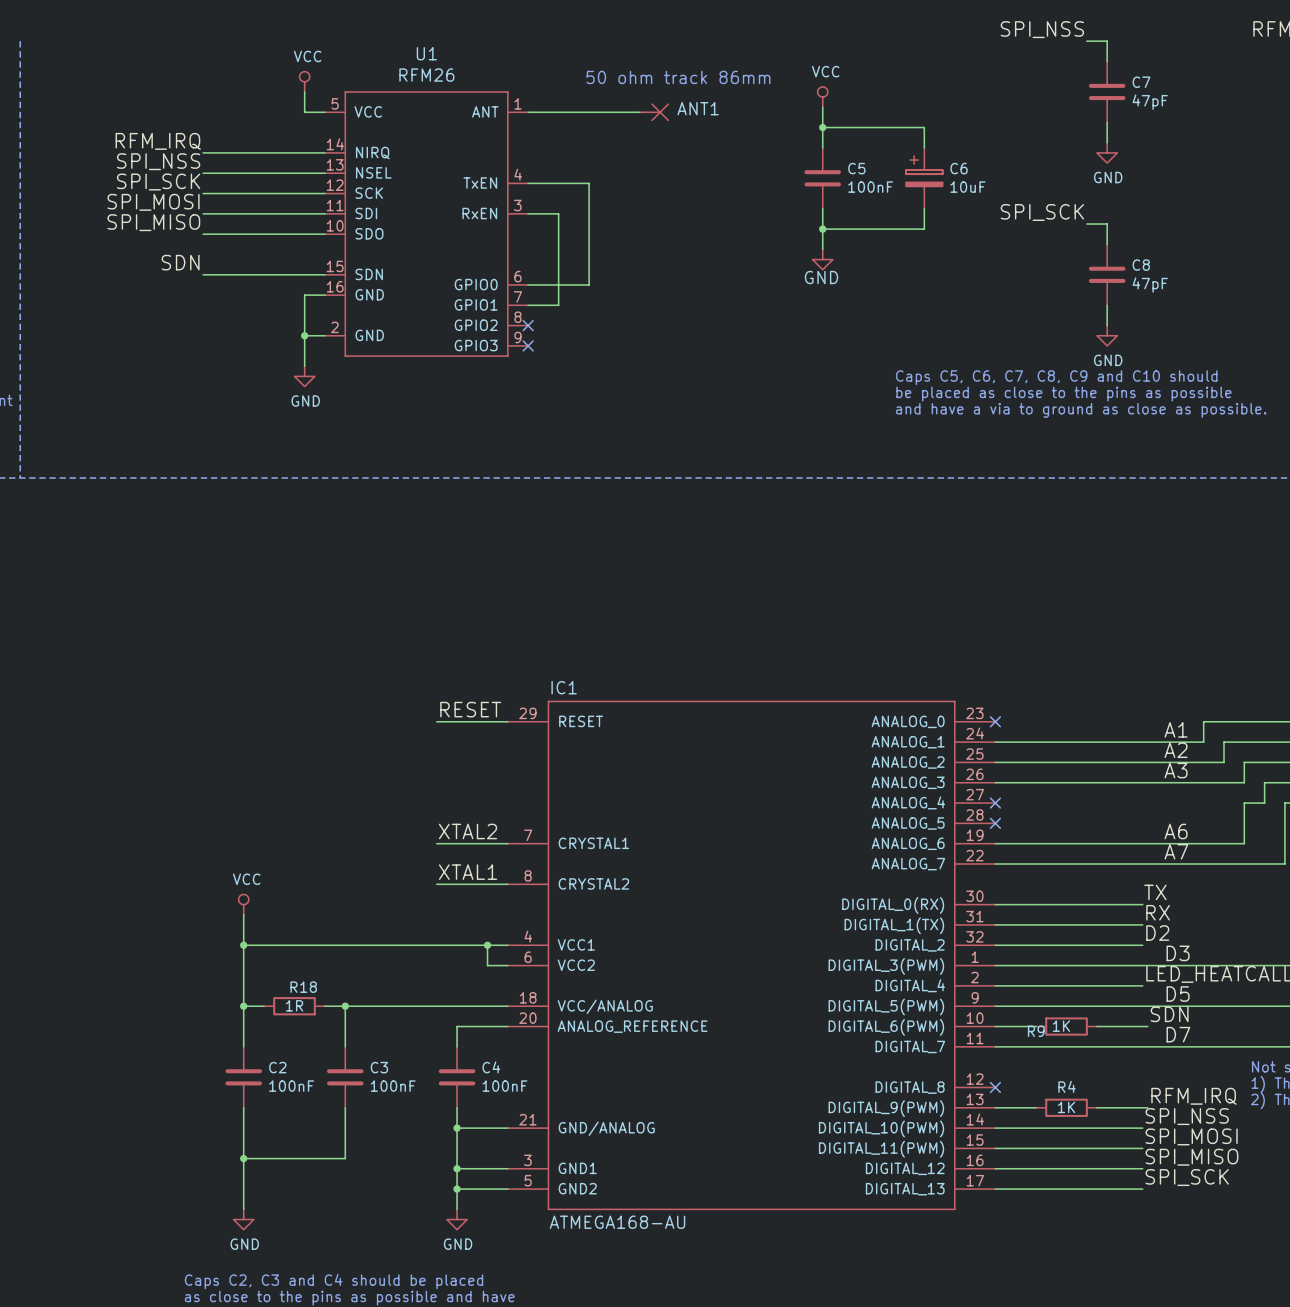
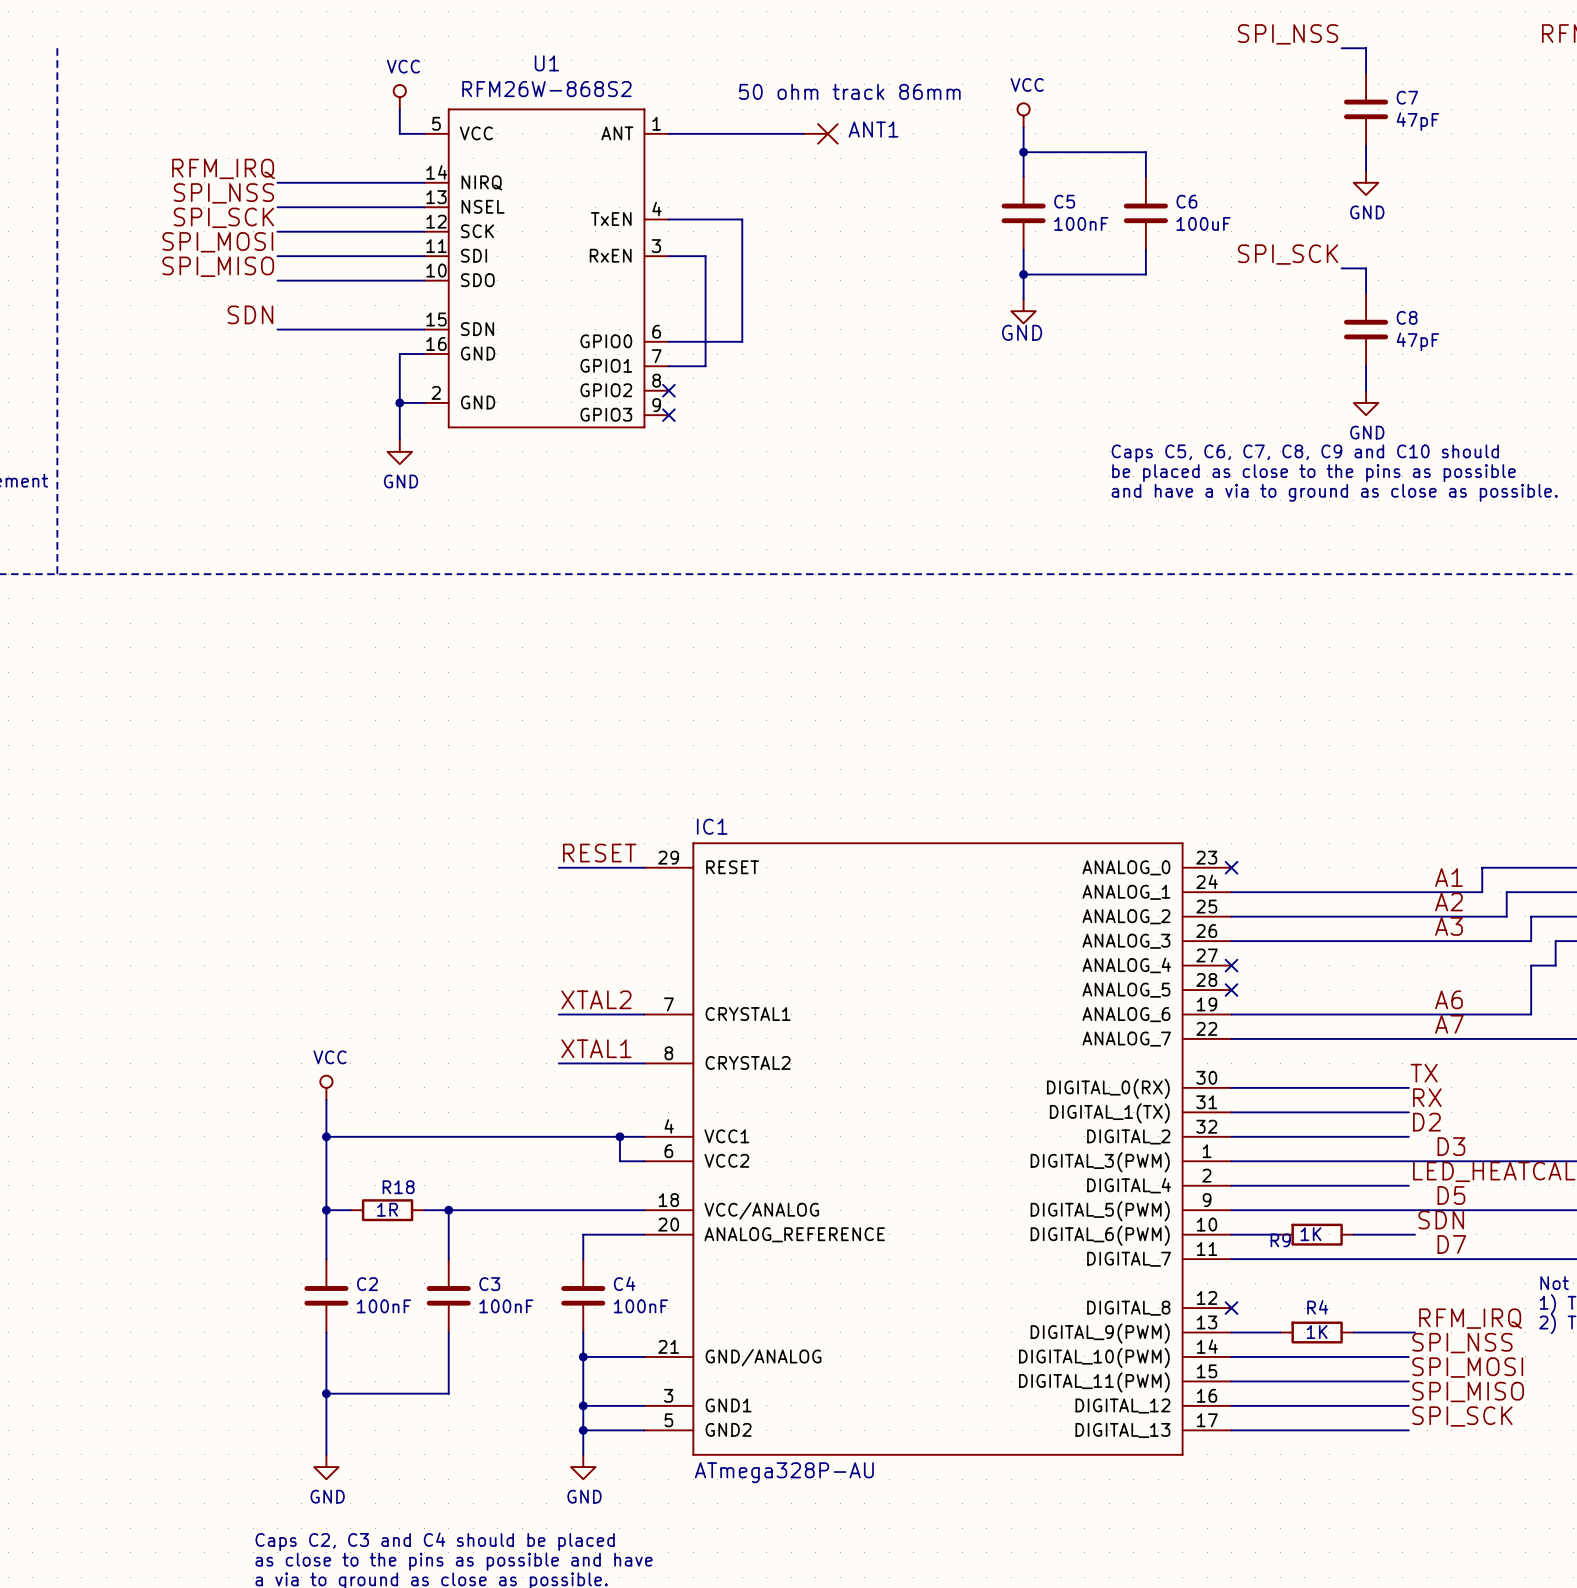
U1 value: RFM26 (426, 75) -> RFM26W-868S2 (546, 89)
C6 symbol: [906, 147, 943, 209] -> [1123, 176, 1168, 251]
C6 value: 10uF (967, 187) -> 100uF (1203, 223)
IC1 value: ATMEGA168-AU (617, 1222) -> ATmega328P-AU (784, 1472)

